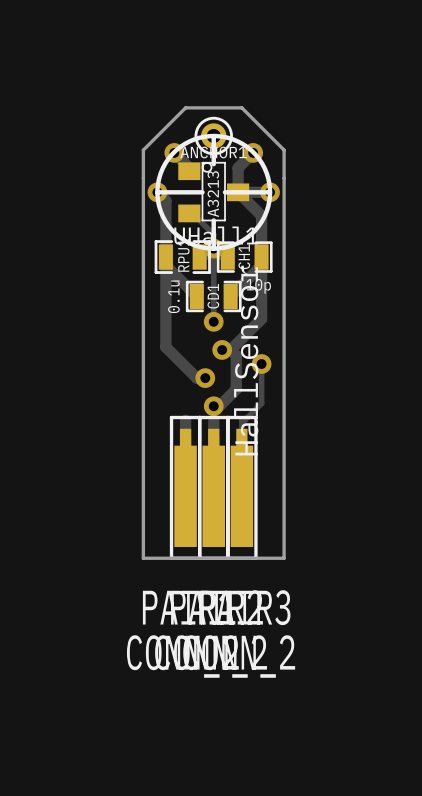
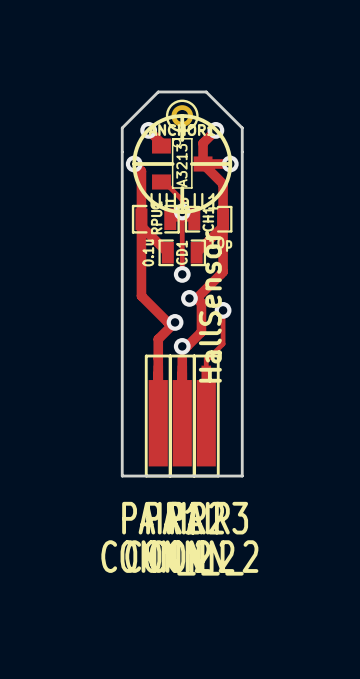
track: none -> (175, 322) (158, 339) (158, 358)

